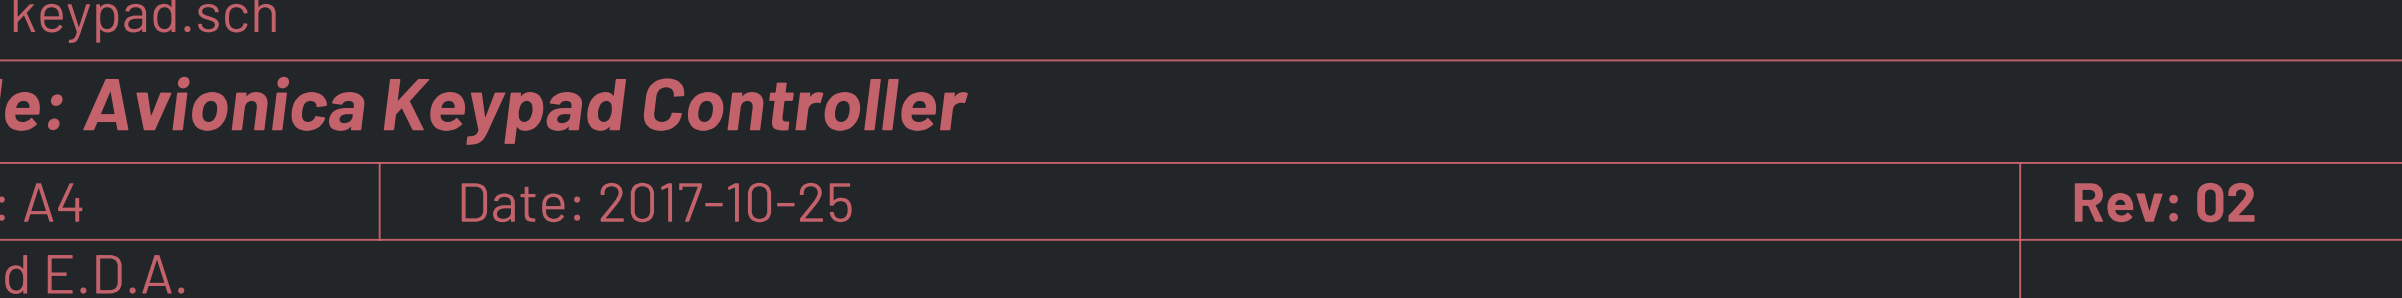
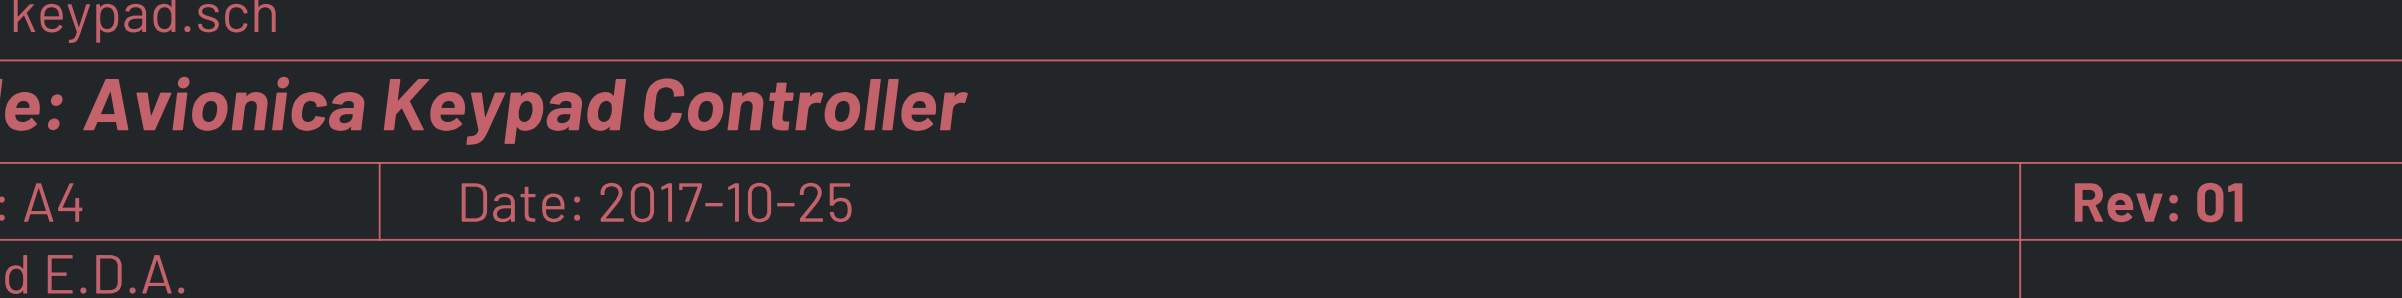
title block: Rev: 02 (2164, 202) -> Rev: 01 (2158, 202)

